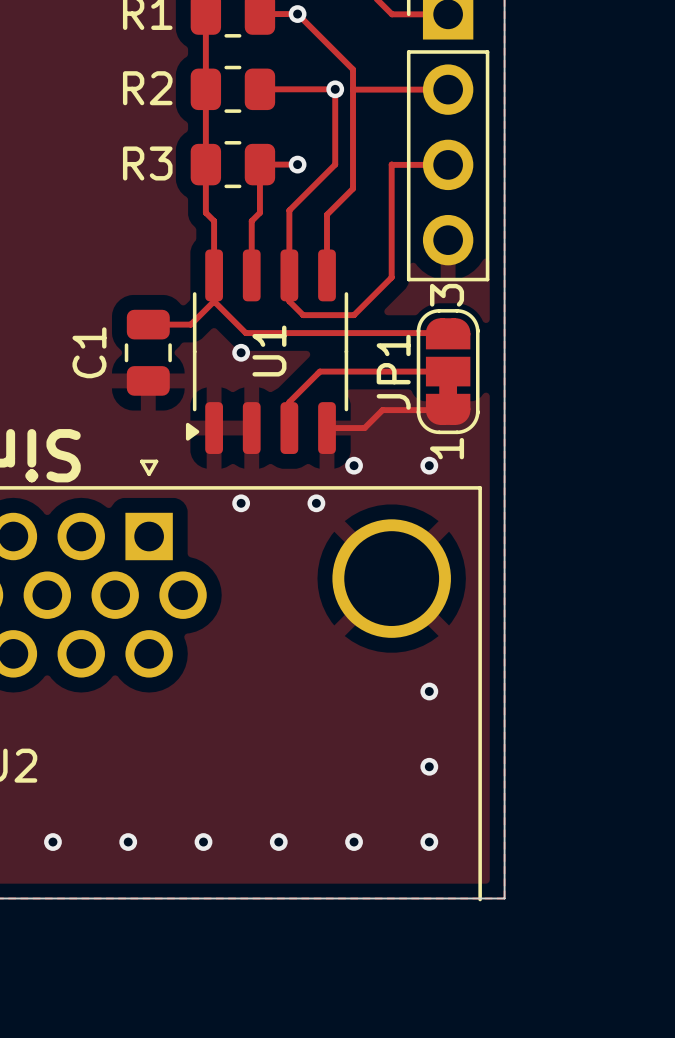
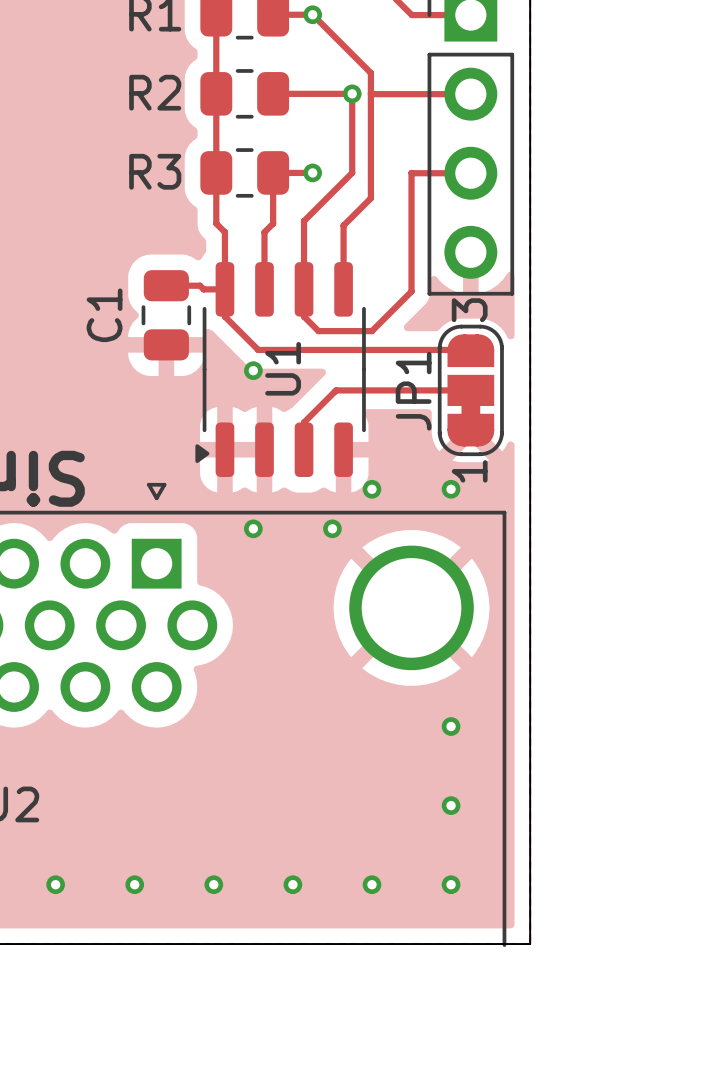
track: none -> (166, 285) (200, 285) (203, 289) (224, 289)
track: (214, 301) (190, 324) (148, 324) -> none
C1 position: (148, 352) -> (166, 315)
track: (448, 410) (382, 410) (364, 428) (327, 428) -> none

